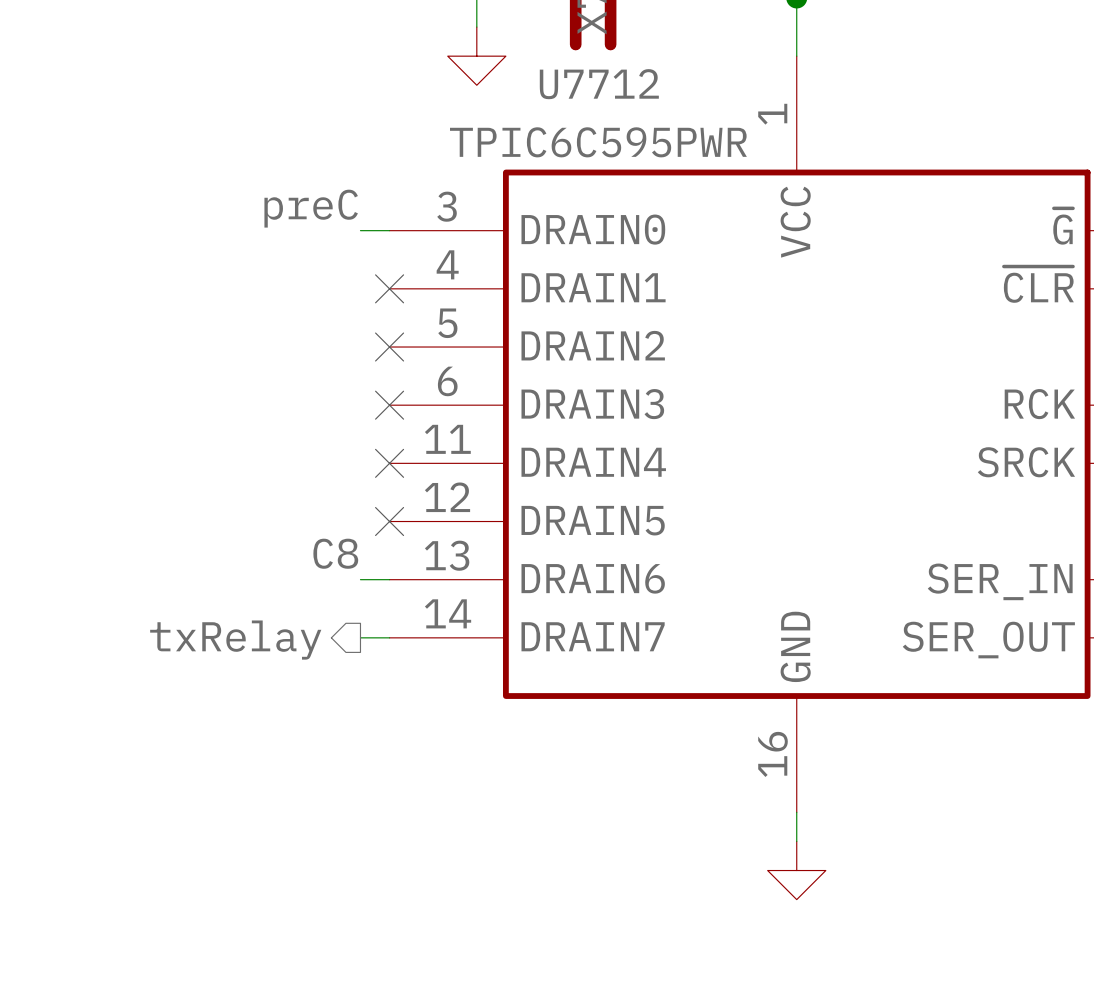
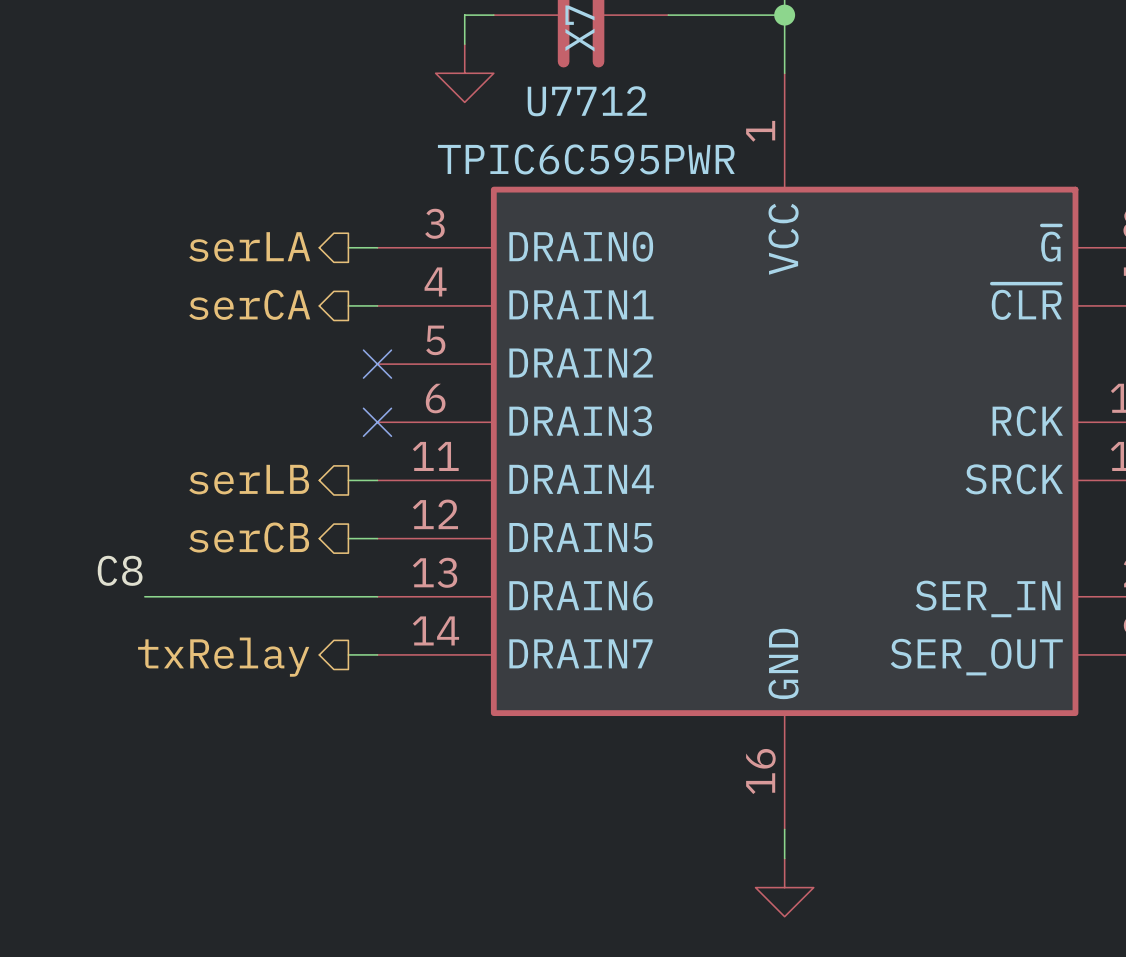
label: preC (311, 208) -> none
hierarchical label: none -> serLA (249, 246)
hierarchical label: none -> serCA (249, 304)
wire: none -> (348, 305) (377, 305)
no-connect mark: (389, 288) -> none
hierarchical label: none -> serLB (249, 479)
wire: none -> (348, 480) (377, 480)
no-connect mark: (389, 463) -> none
hierarchical label: none -> serCB (249, 537)
wire: none -> (348, 538) (377, 538)
no-connect mark: (389, 521) -> none
label position: C8 (335, 553) -> C8 (120, 570)
wire: none -> (144, 596) (348, 596)

